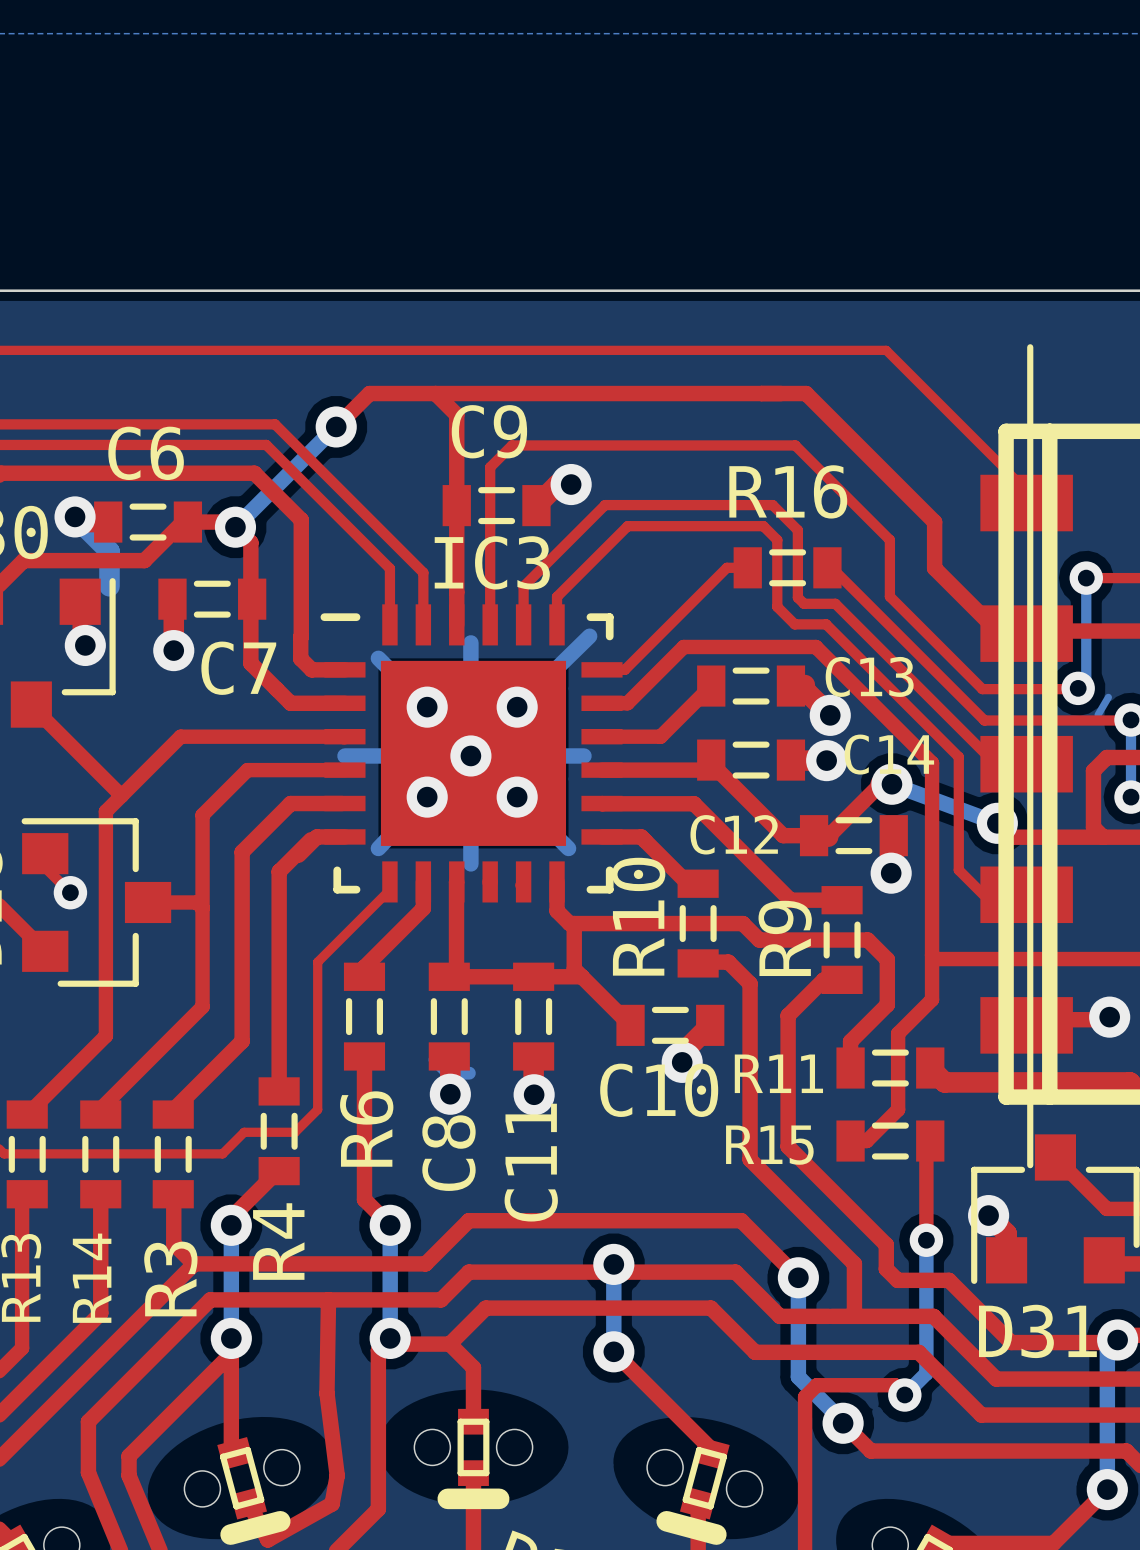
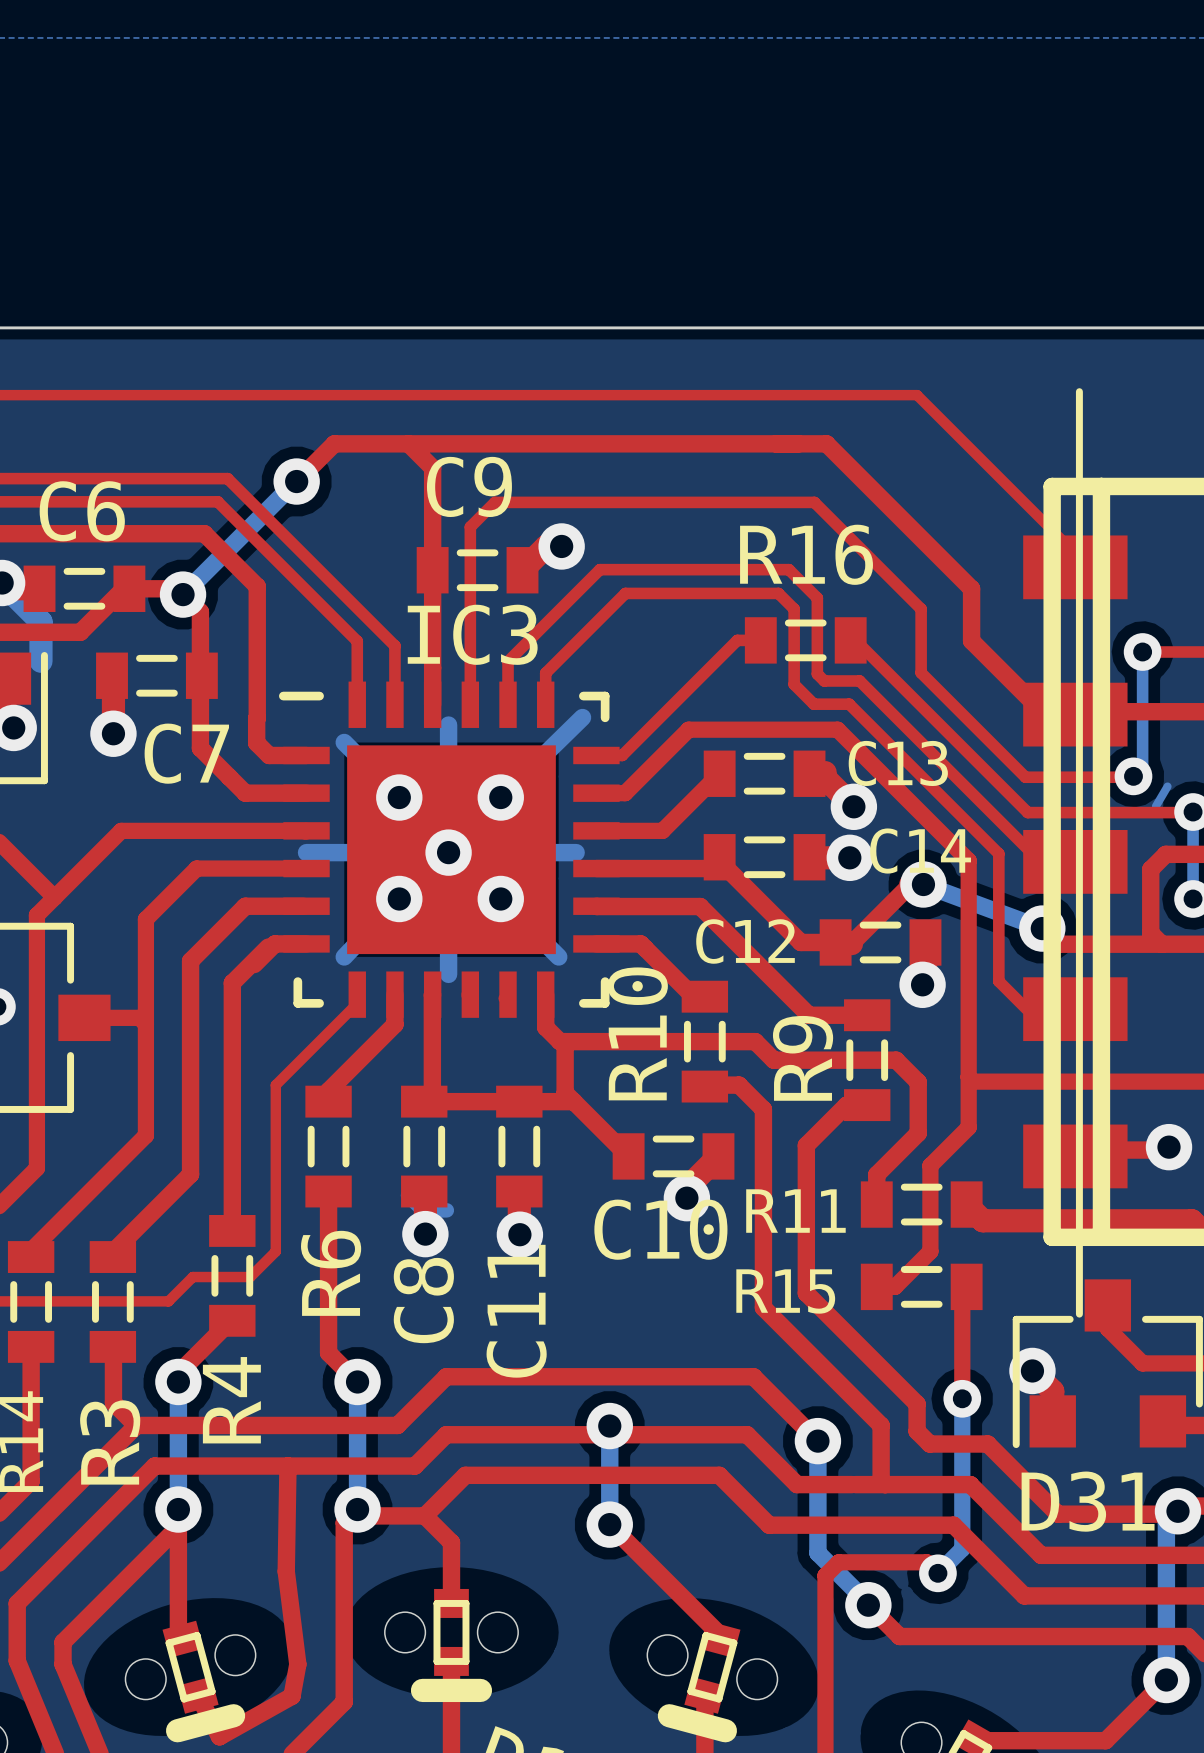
top track: (1055, 1157) (1106, 1208) -> (1107, 1305) (1107, 1328) (1142, 1363) (1165, 1363)

